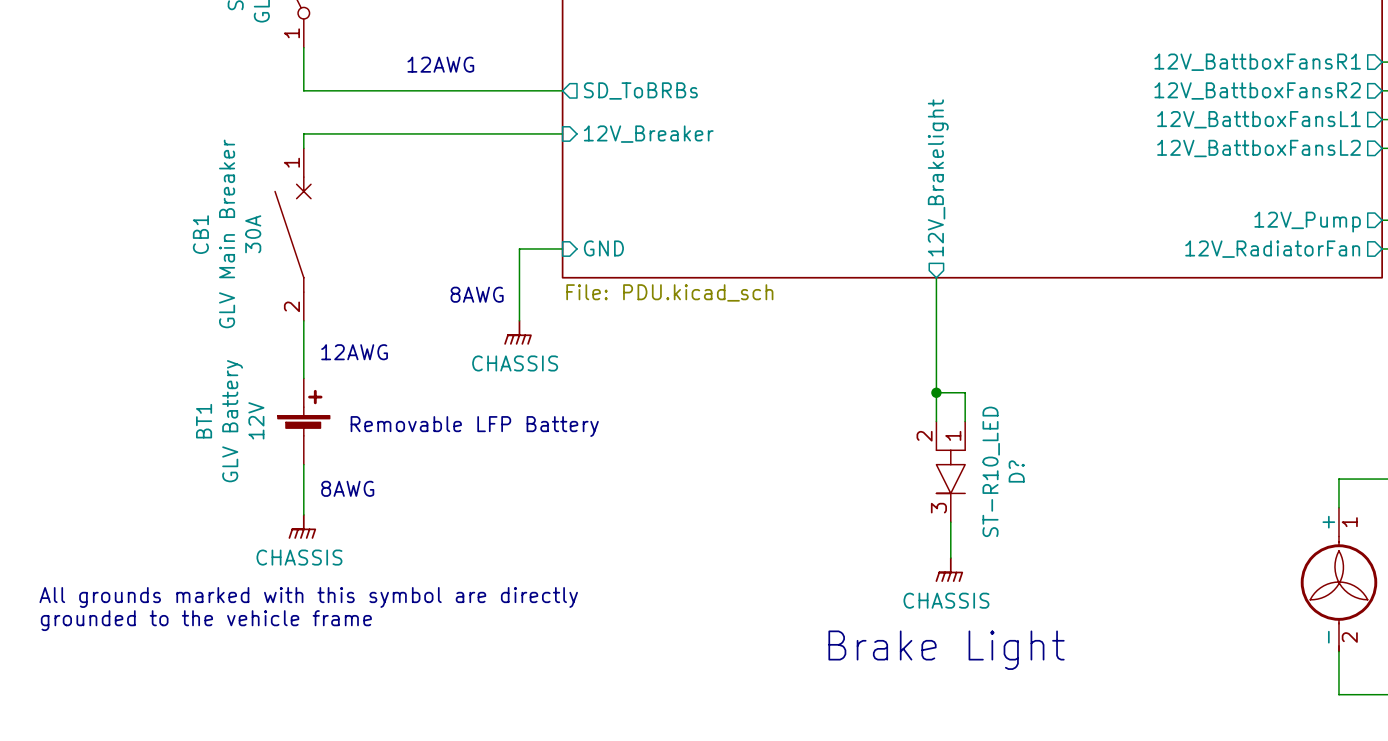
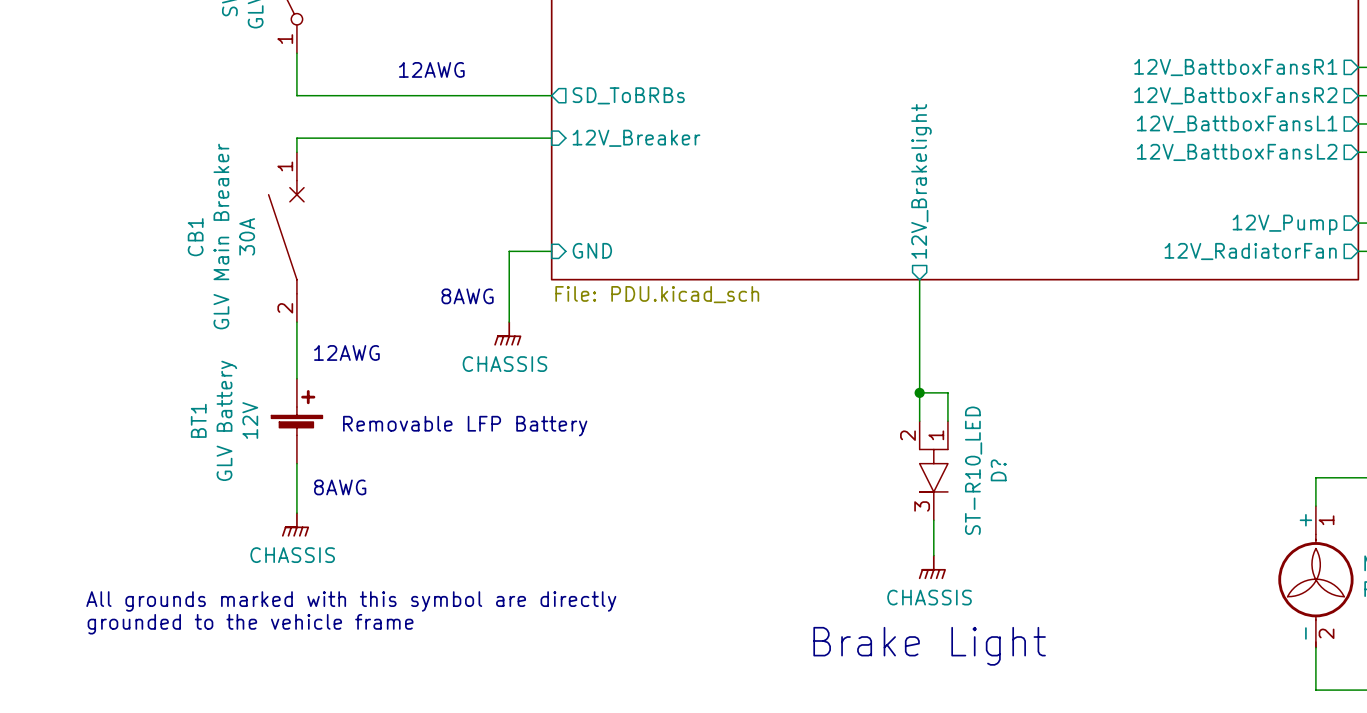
text position: All grounds marked with this symbol are directly (308, 597) -> All grounds marked with this symbol are directly (351, 601)
text position: grounded to the vehicle frame (206, 620) -> grounded to the vehicle frame (250, 624)

